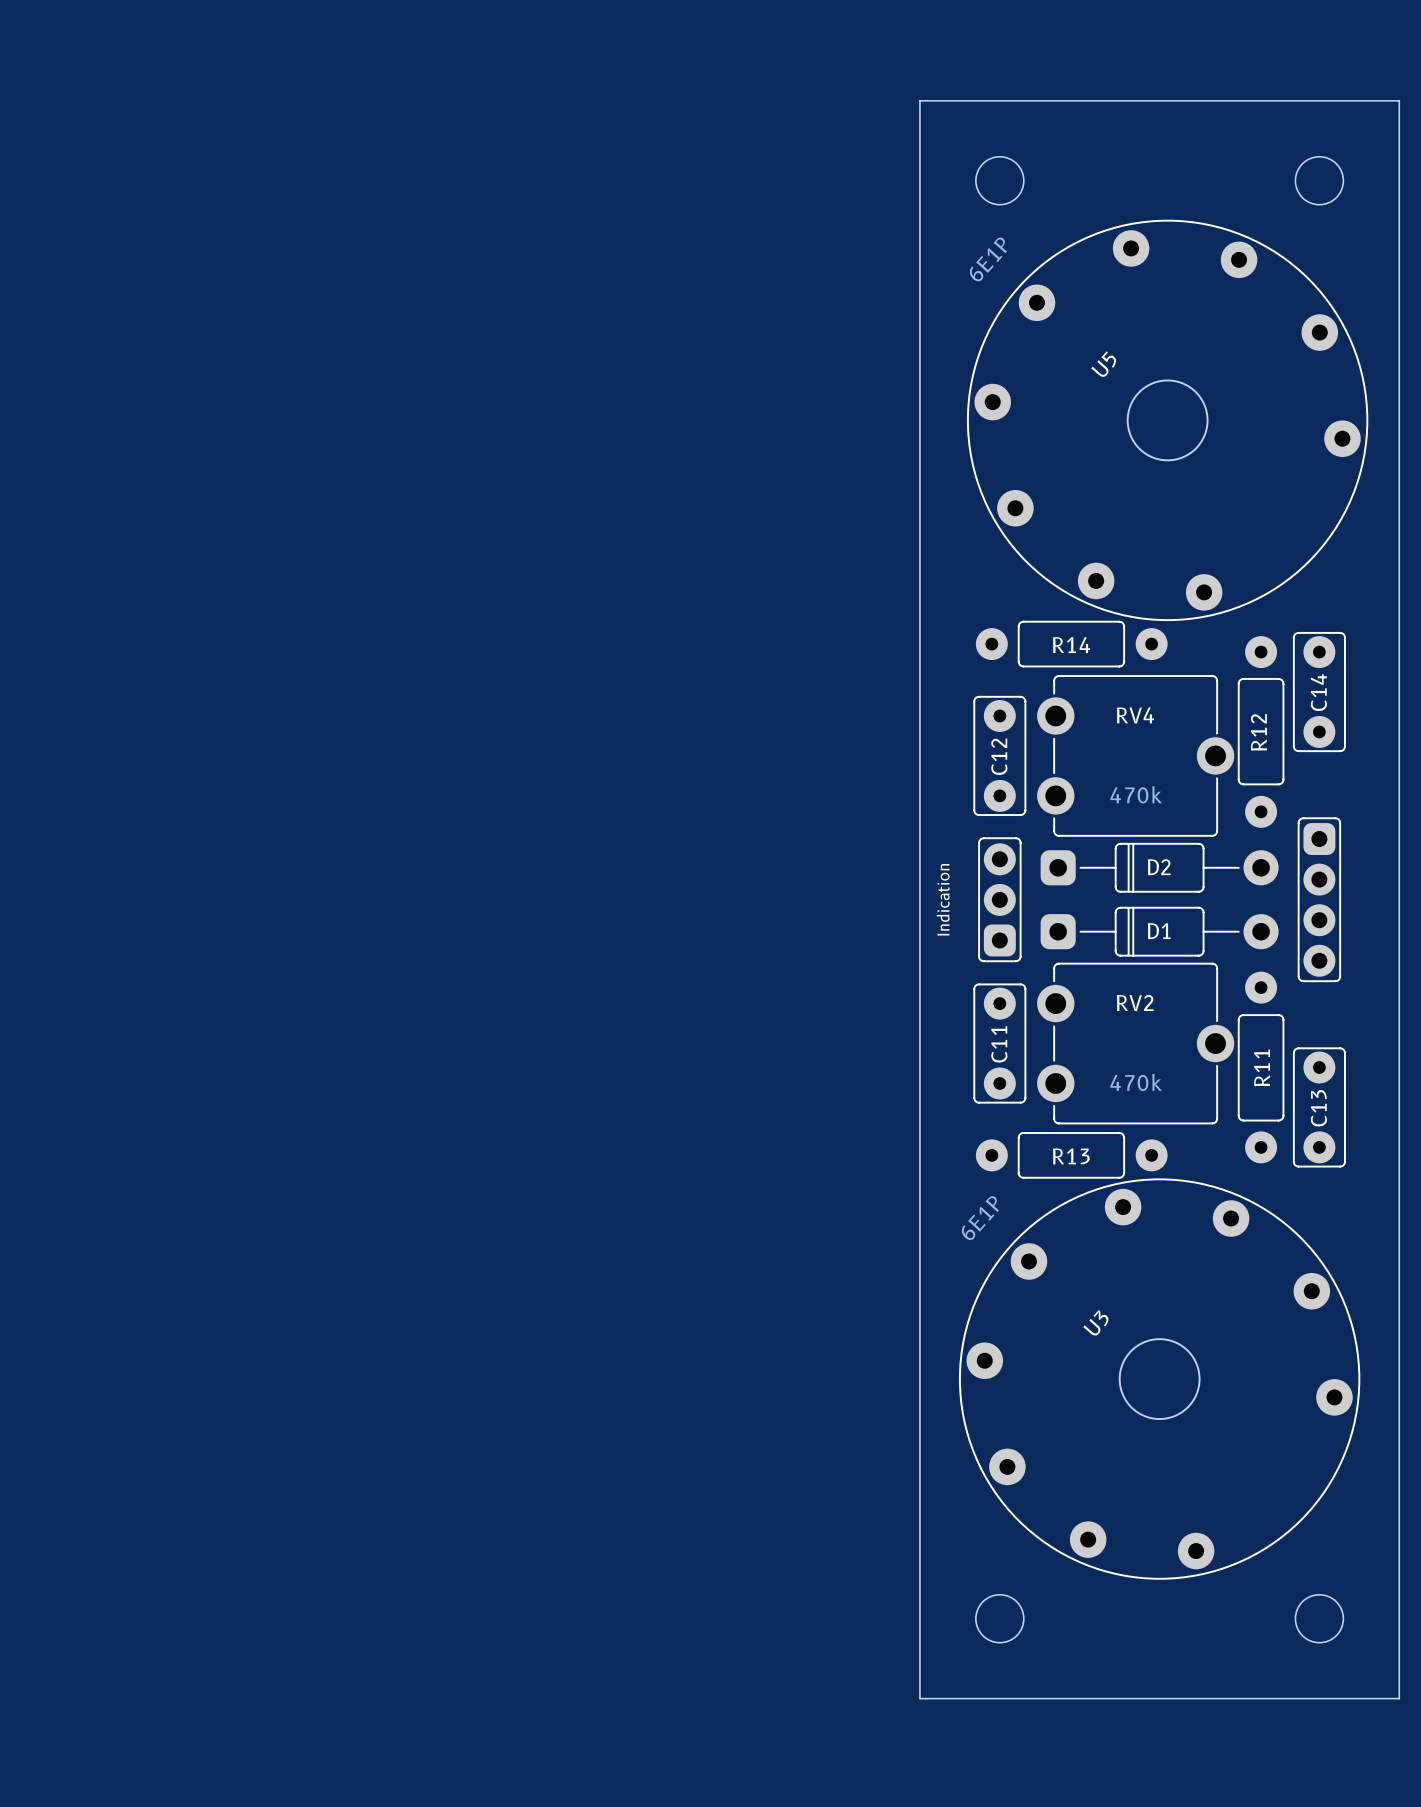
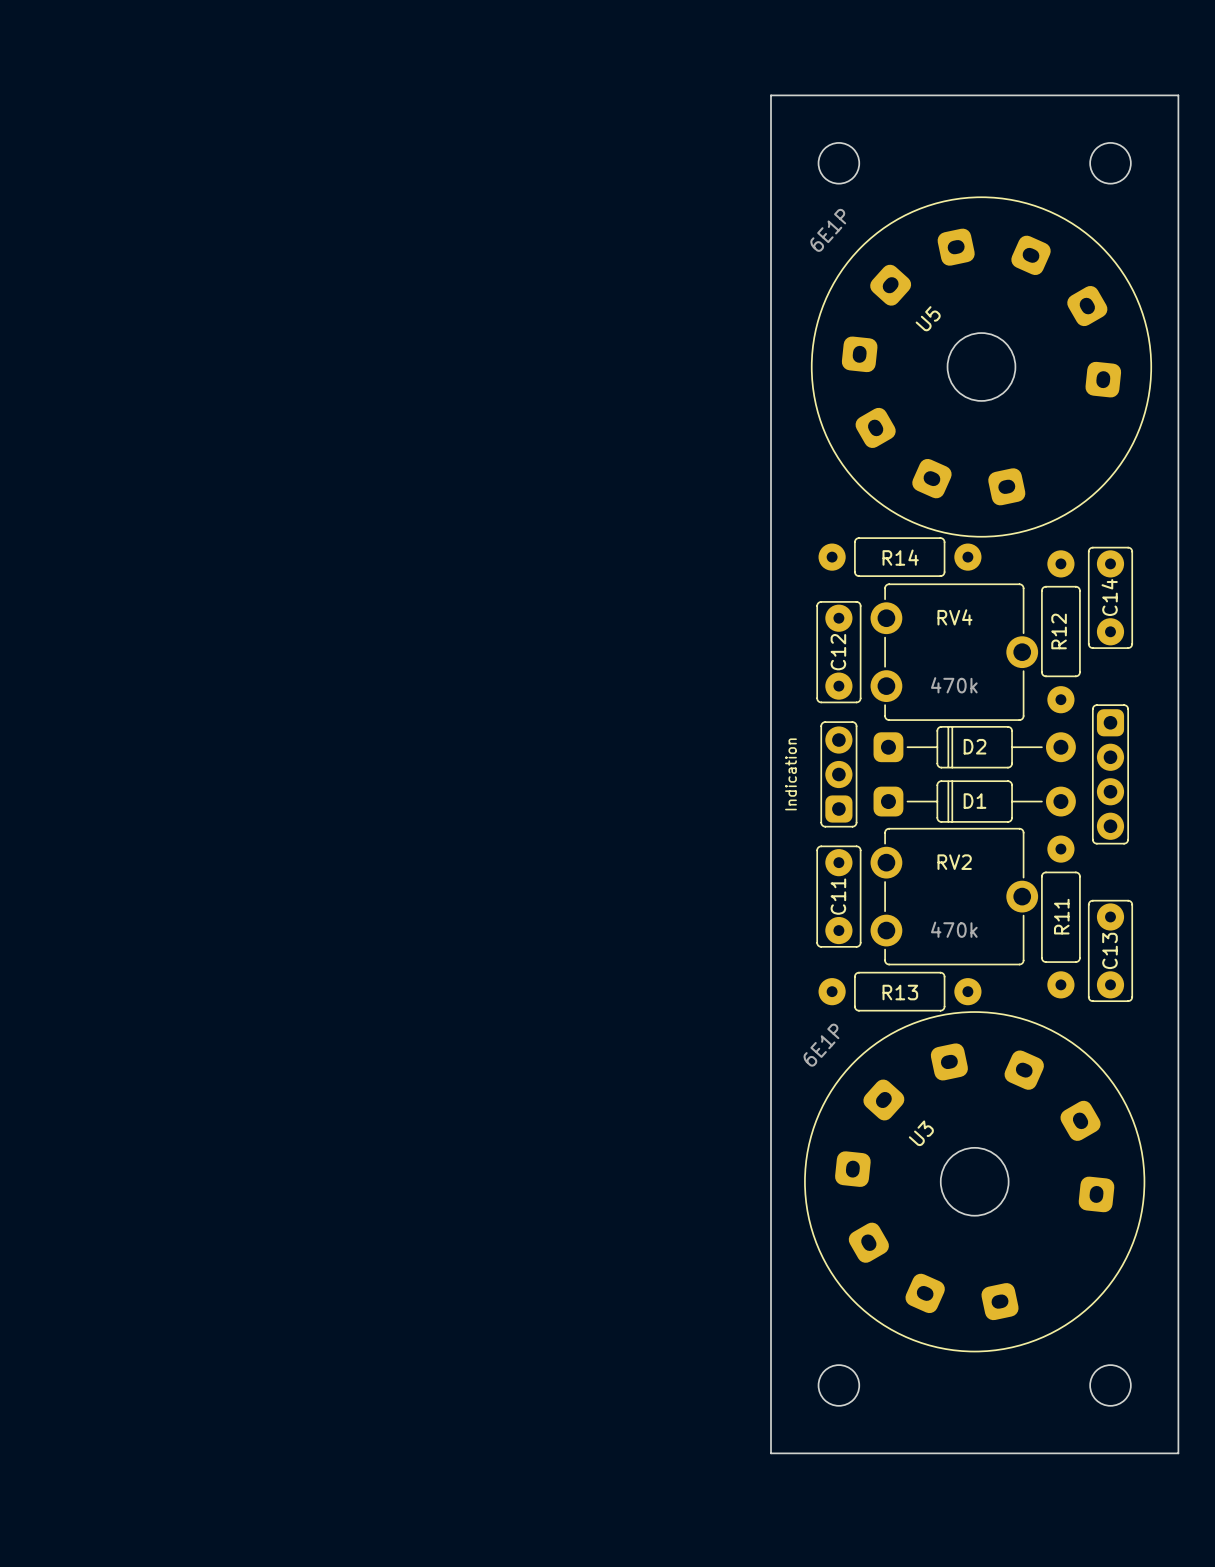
U5 footprint: [966, 219, 1369, 622] -> [810, 196, 1153, 538]
U3 footprint: [958, 1178, 1361, 1580] -> [804, 1011, 1146, 1353]

